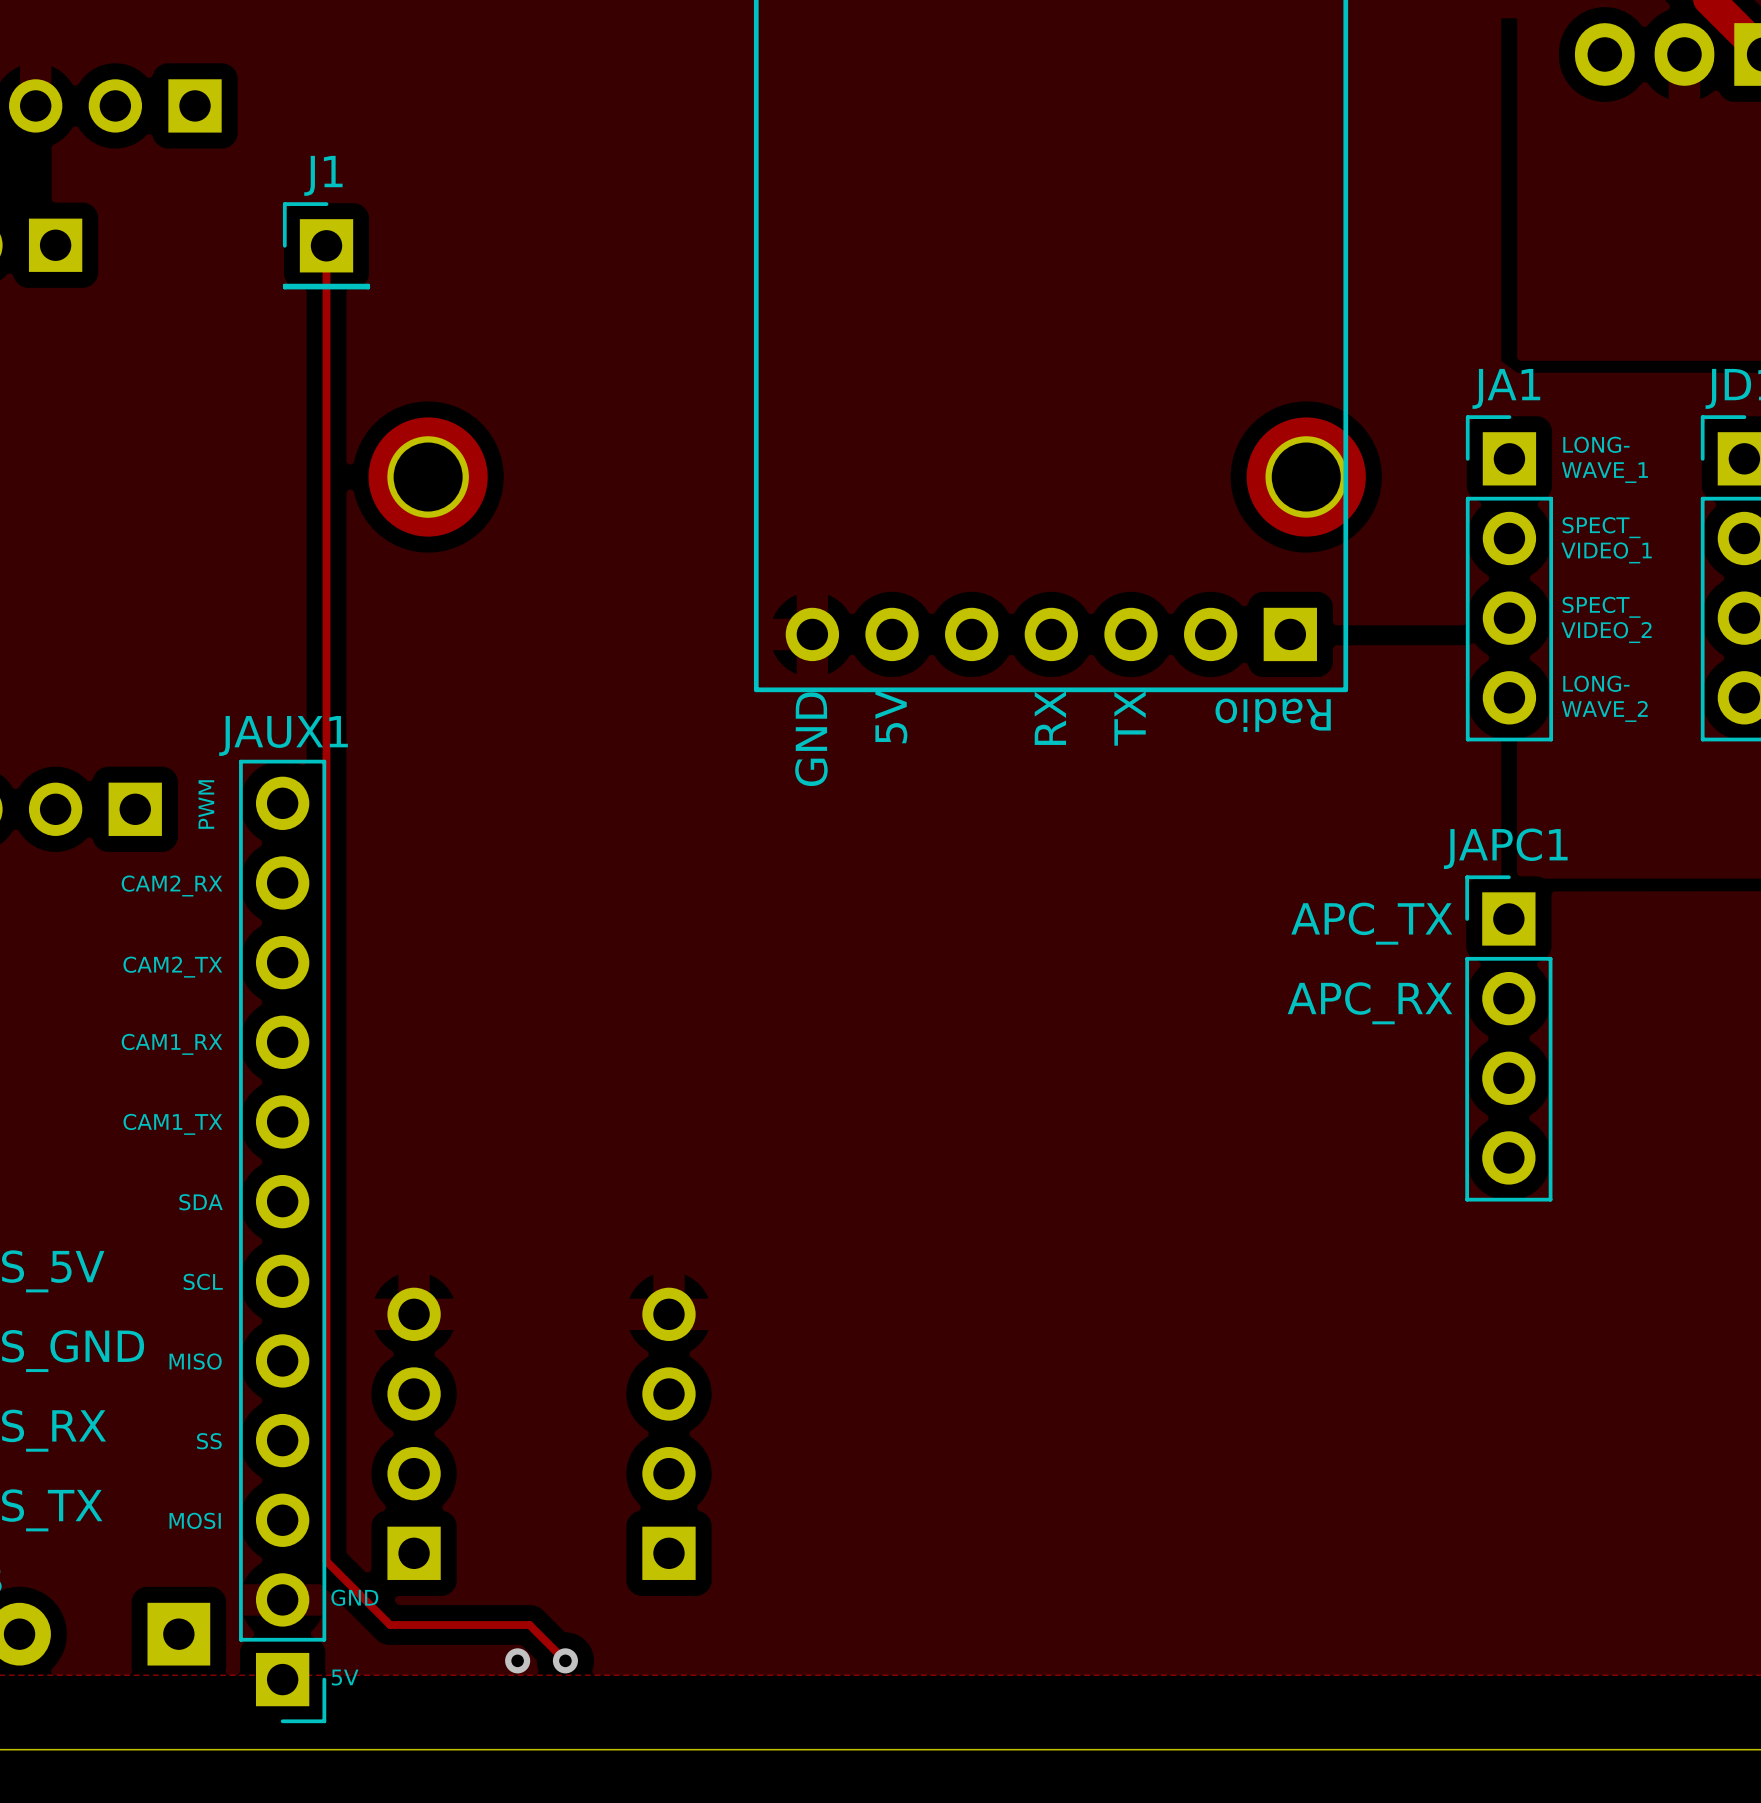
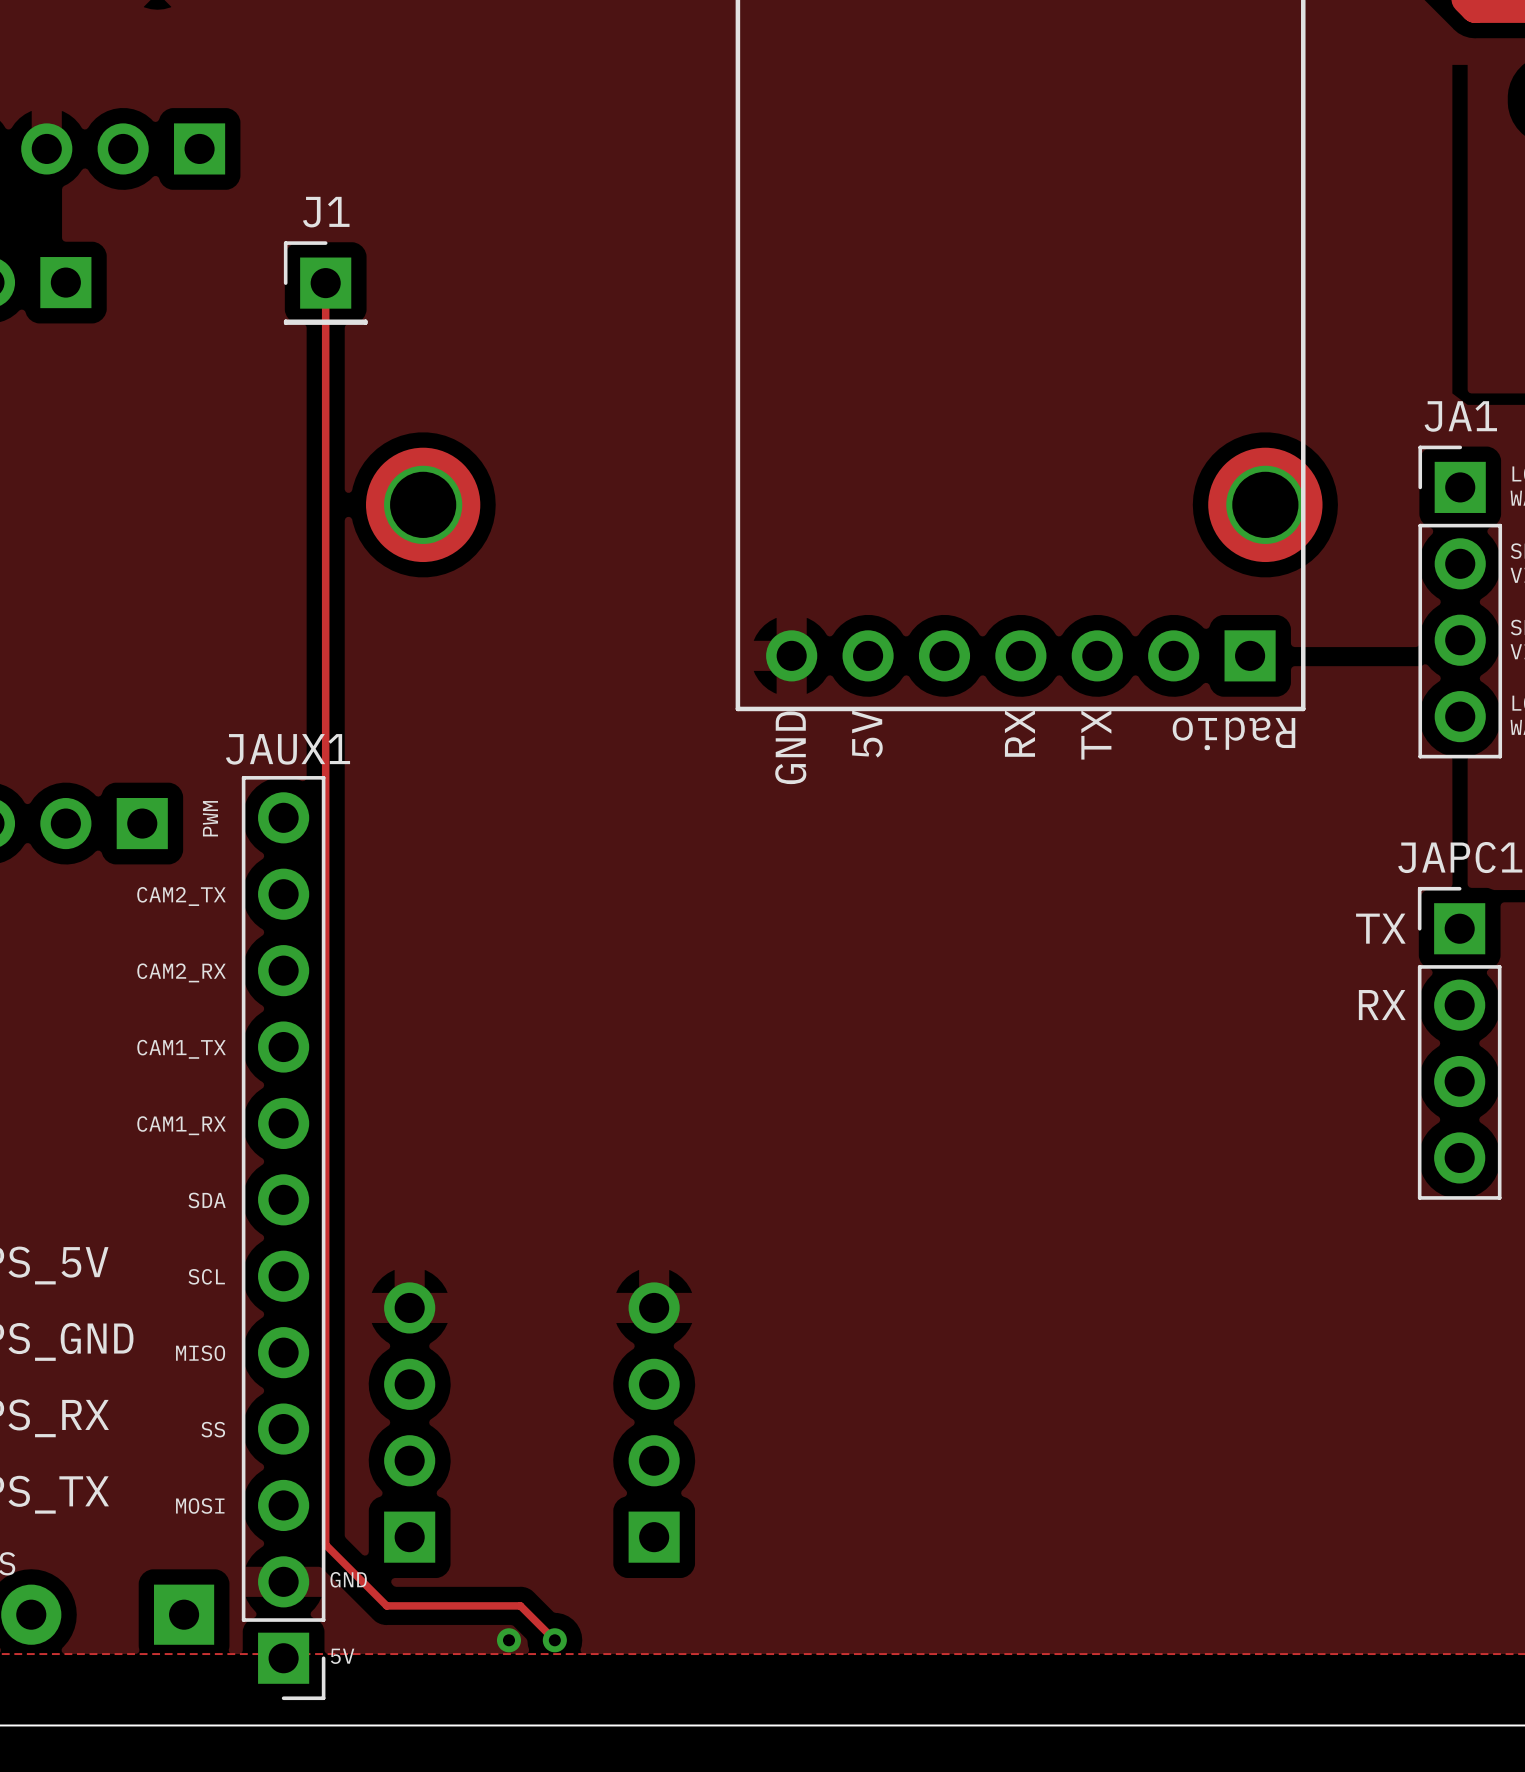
text: CAM2_RX (171, 885) -> CAM2_TX (181, 896)
text: APC_TX (1371, 923) -> TX (1380, 928)
text: CAM2_TX (172, 967) -> CAM2_RX (181, 972)
text: APC_RX (1369, 1003) -> RX (1382, 1005)
text: CAM1_RX (171, 1044) -> CAM1_TX (181, 1049)
text: CAM1_TX (172, 1124) -> CAM1_RX (181, 1125)

